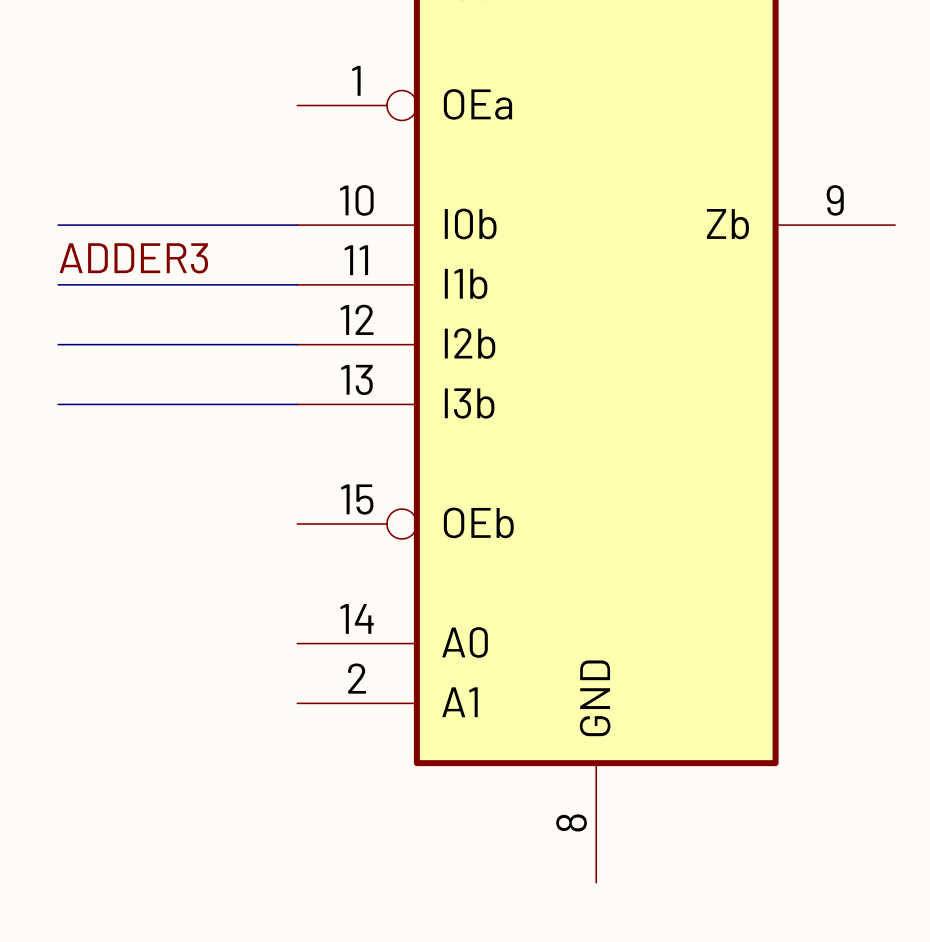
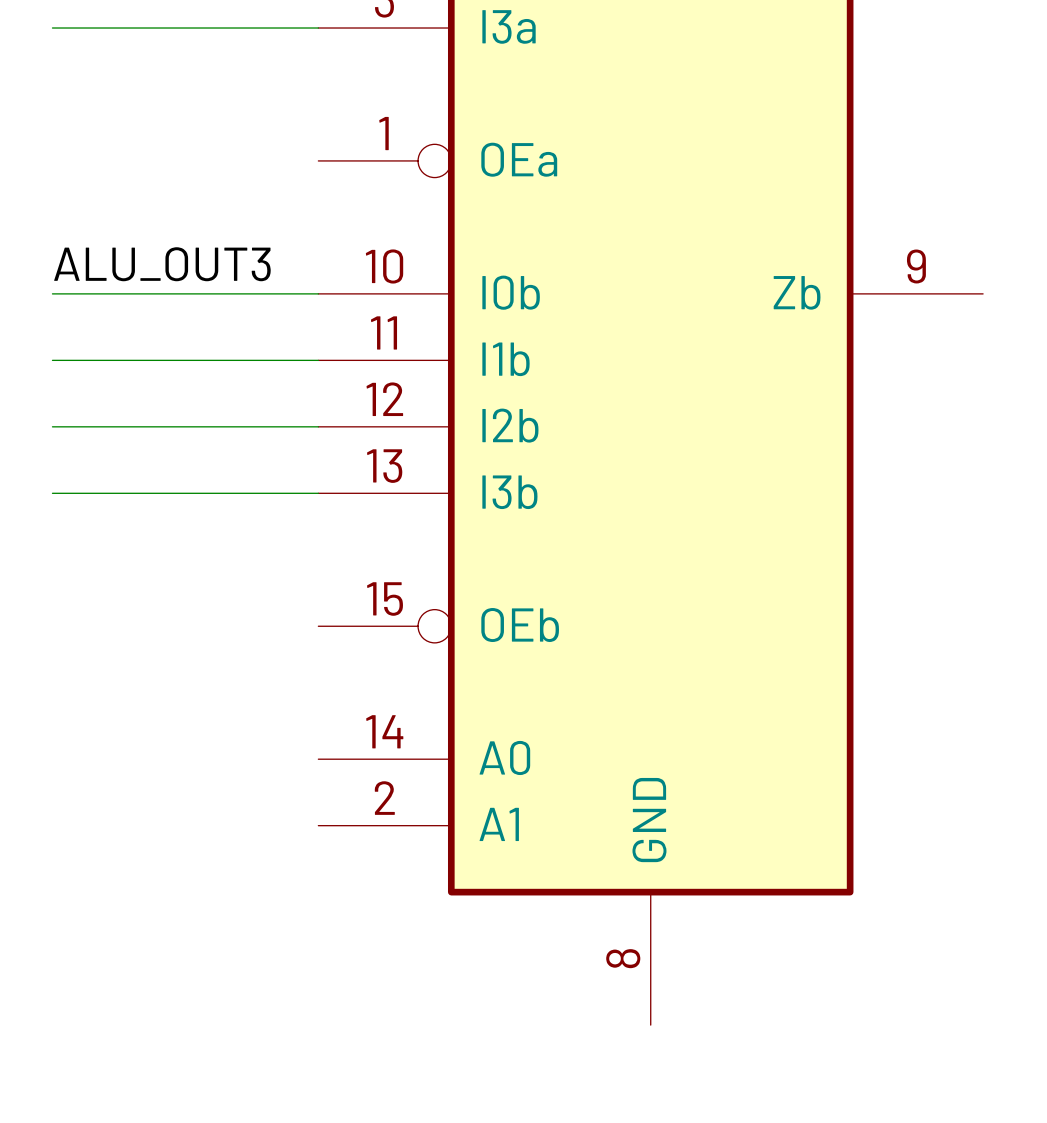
label: none -> ALU_OUT3 (162, 264)
label: ADDER3 (133, 258) -> none

